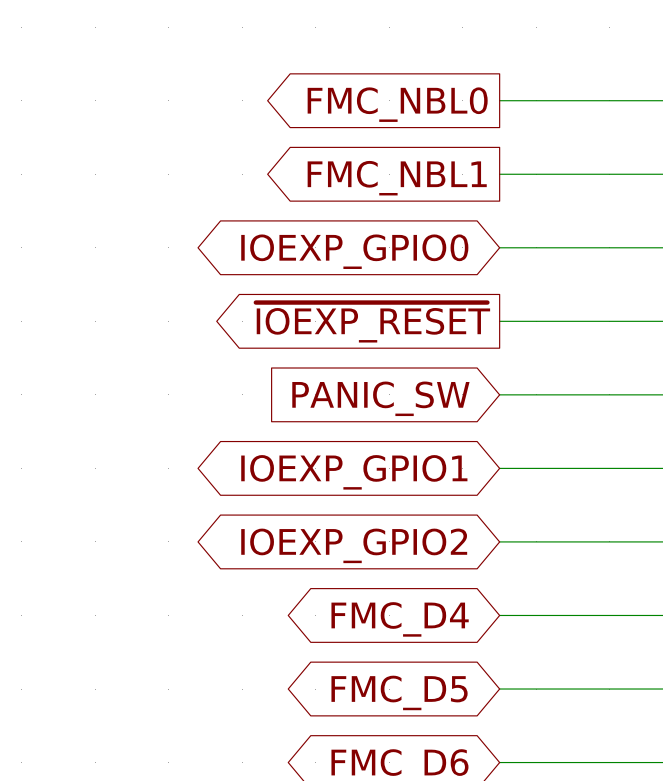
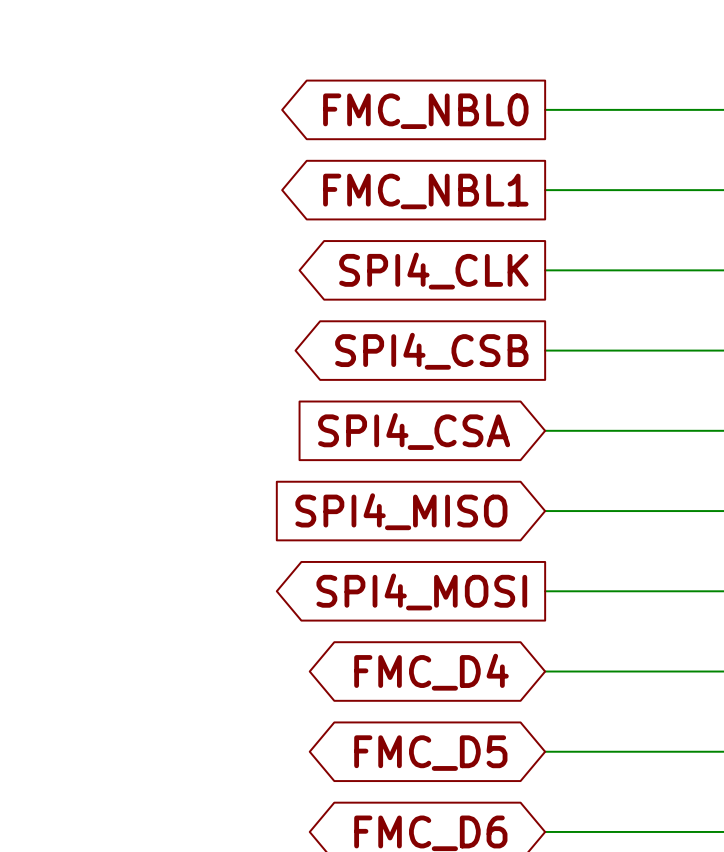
global label shape: bidirectional (354, 251) -> output (433, 271)
global label: IOEXP_GPIO0 (354, 251) -> SPI4_CLK (433, 271)
global label: ~{IOEXP_RESET} (372, 322) -> SPI4_CSB (431, 351)
global label: PANIC_SW (380, 398) -> SPI4_CSA (414, 431)
global label shape: bidirectional (354, 472) -> input (401, 511)
global label: IOEXP_GPIO1 (354, 472) -> SPI4_MISO (401, 511)
global label shape: bidirectional (354, 545) -> output (421, 591)
global label: IOEXP_GPIO2 (354, 545) -> SPI4_MOSI (421, 591)

